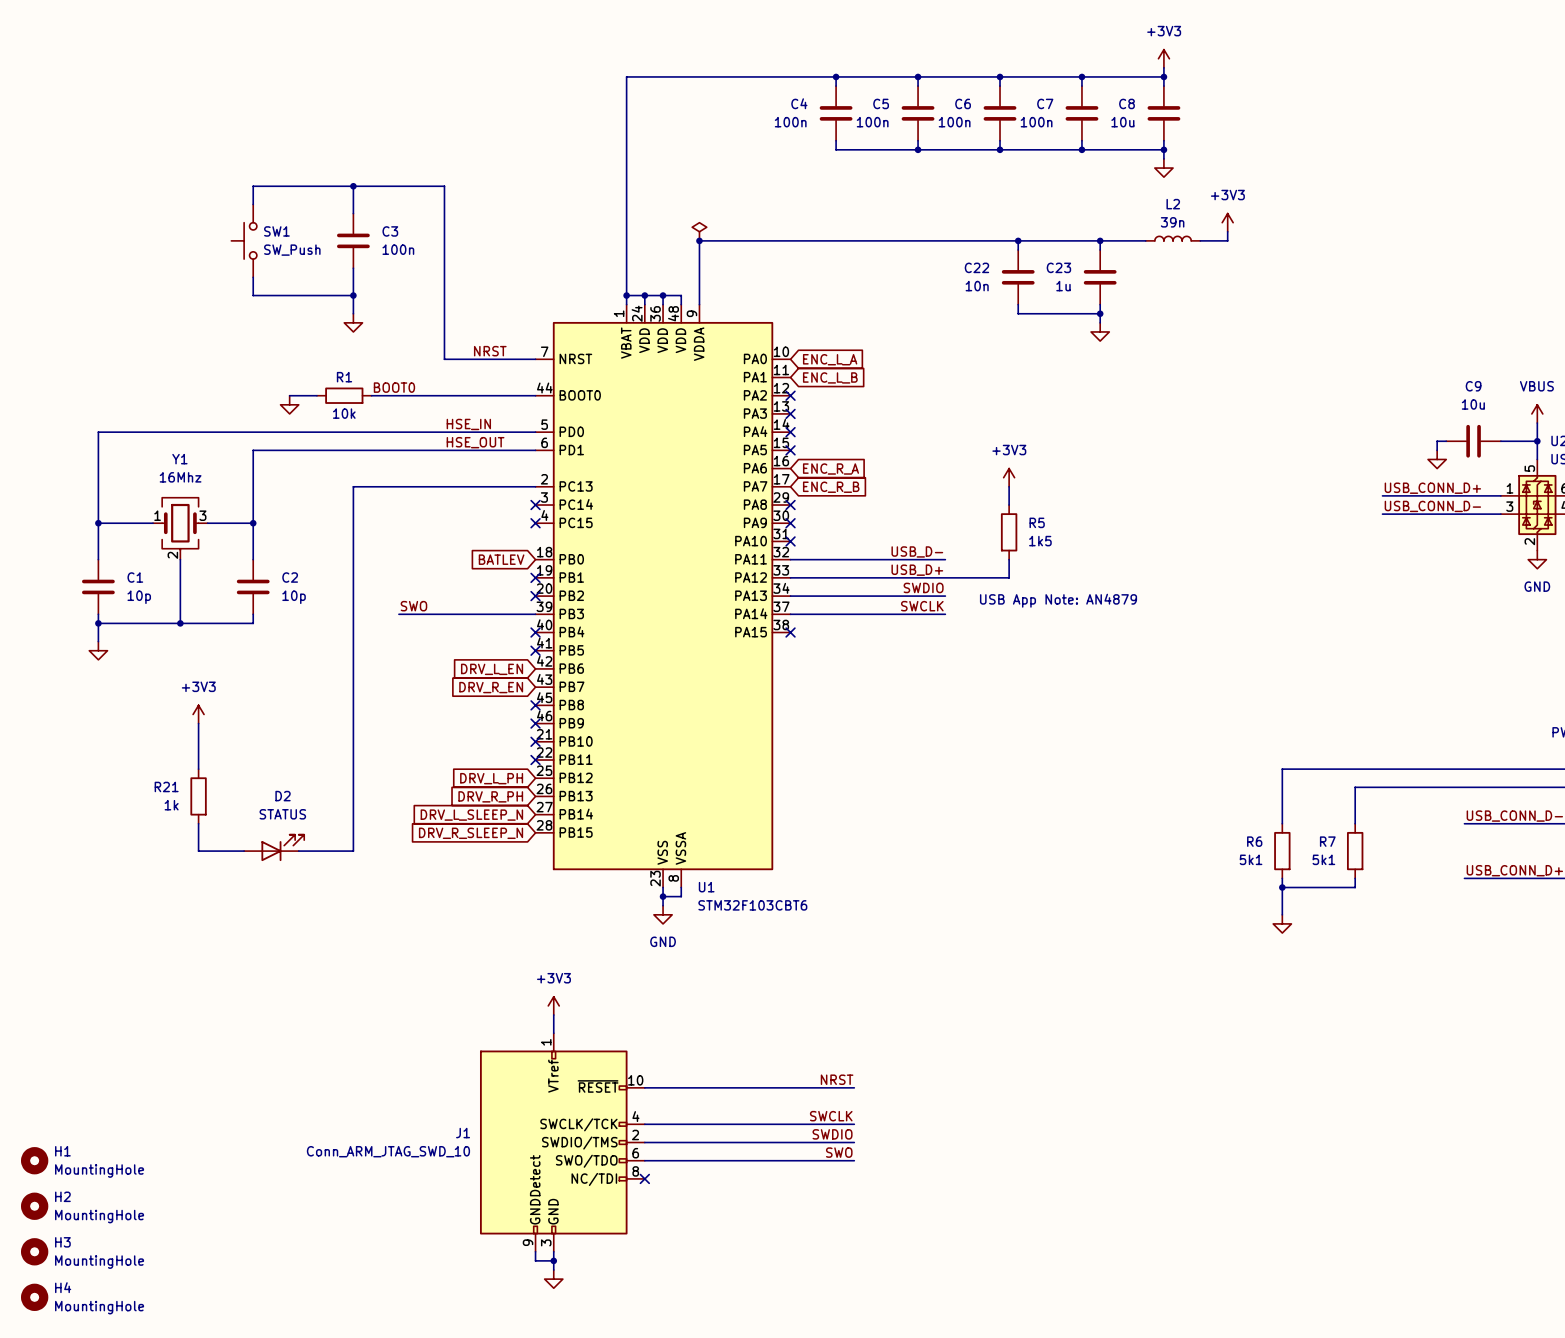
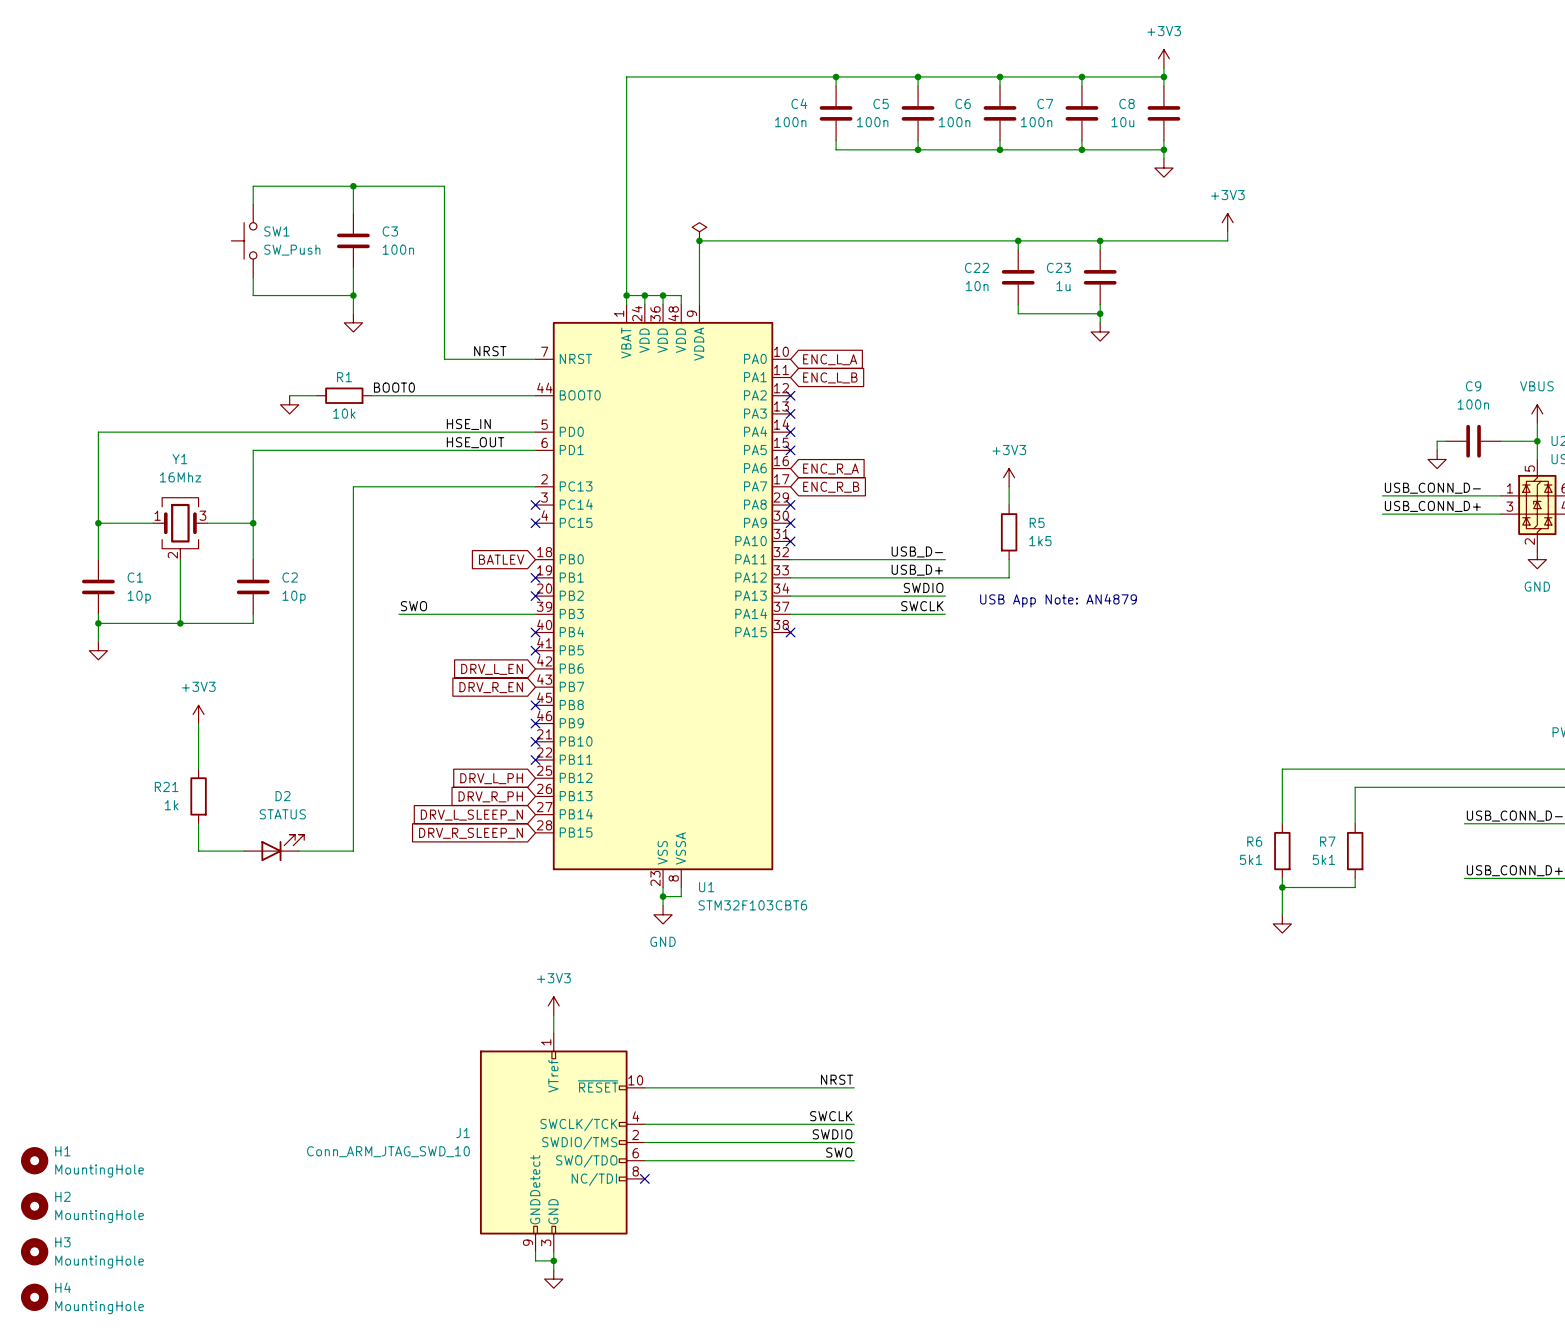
L2: 39n (1173, 238) -> none
wire: none -> (1145, 240) (1200, 240)
C9 value: 10u (1473, 404) -> 100n (1473, 404)
label: USB_CONN_D+ (1432, 488) -> USB_CONN_D- (1432, 488)
label: USB_CONN_D- (1432, 506) -> USB_CONN_D+ (1432, 506)

